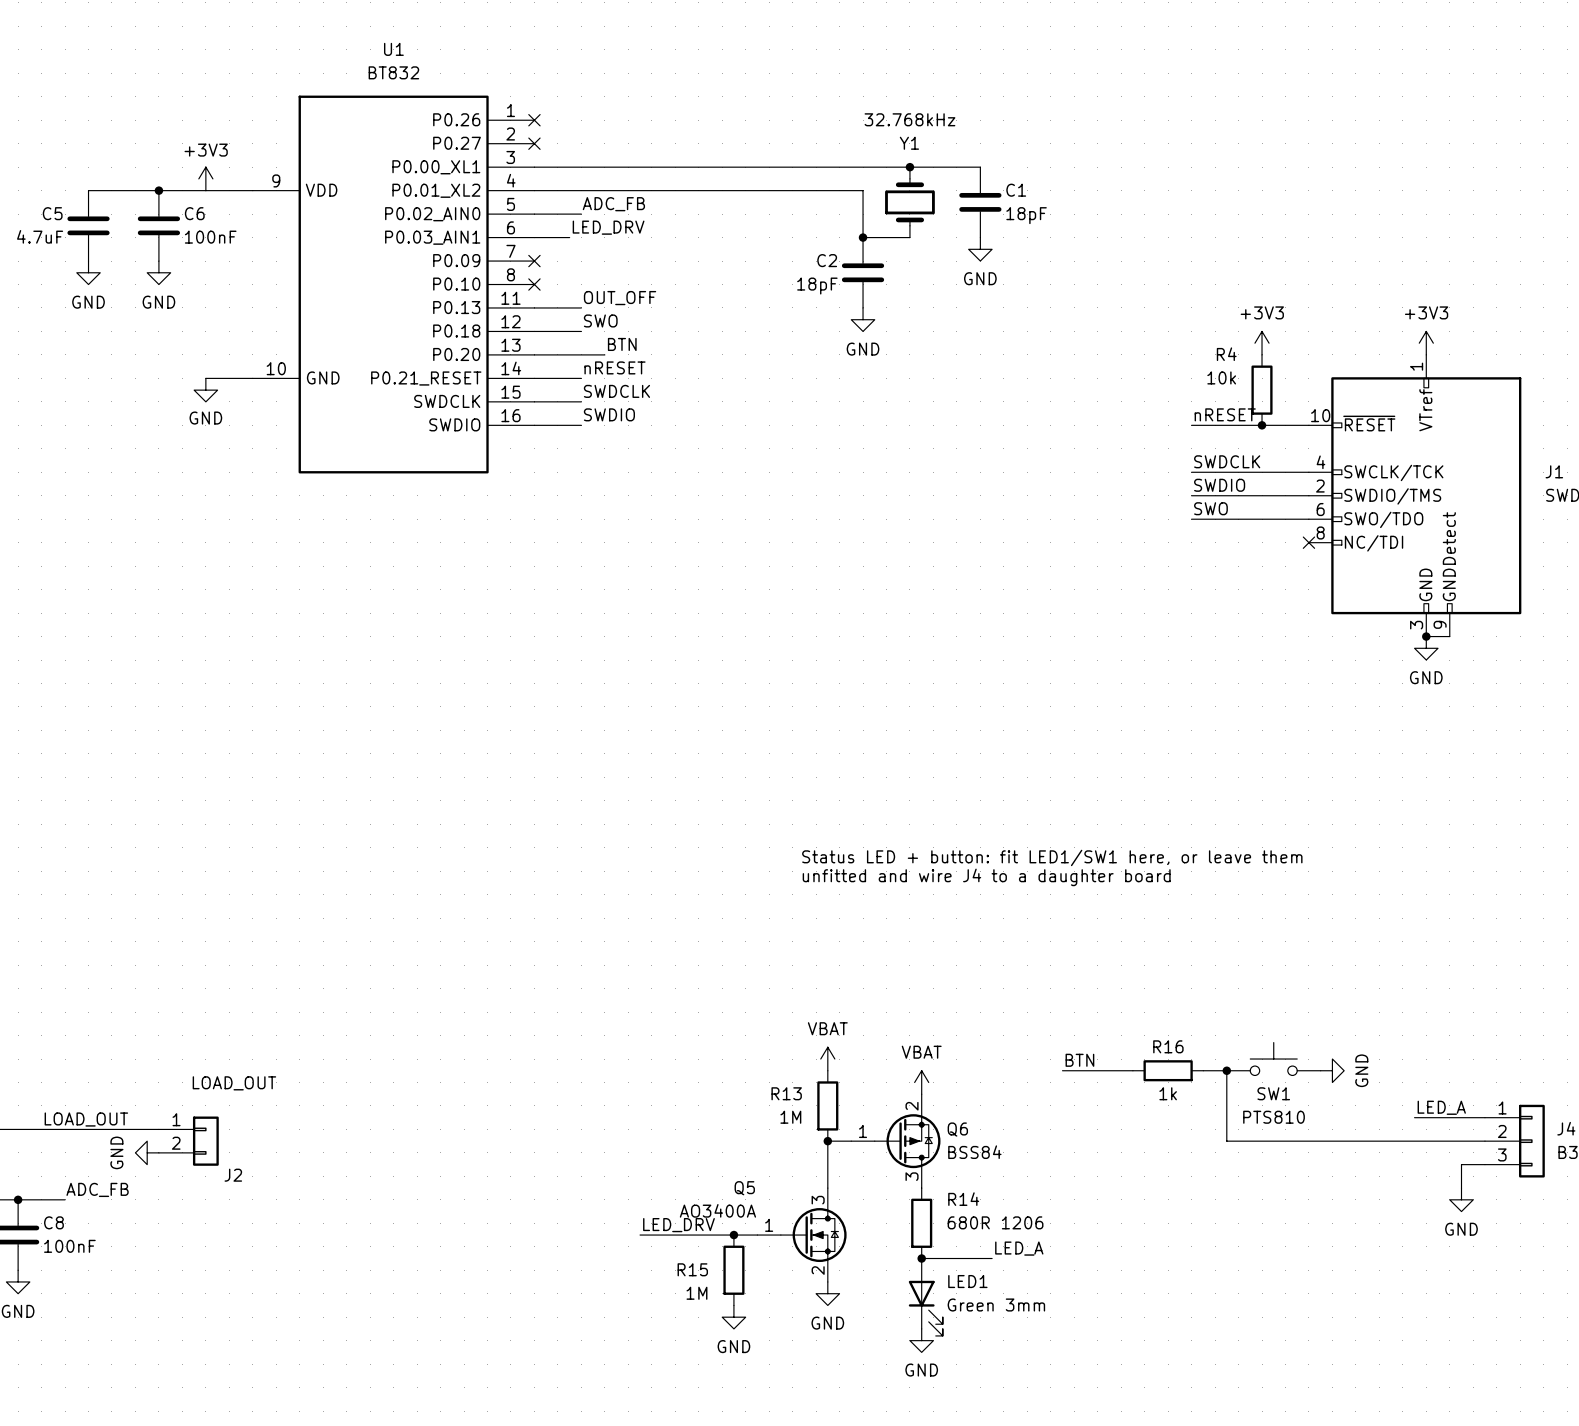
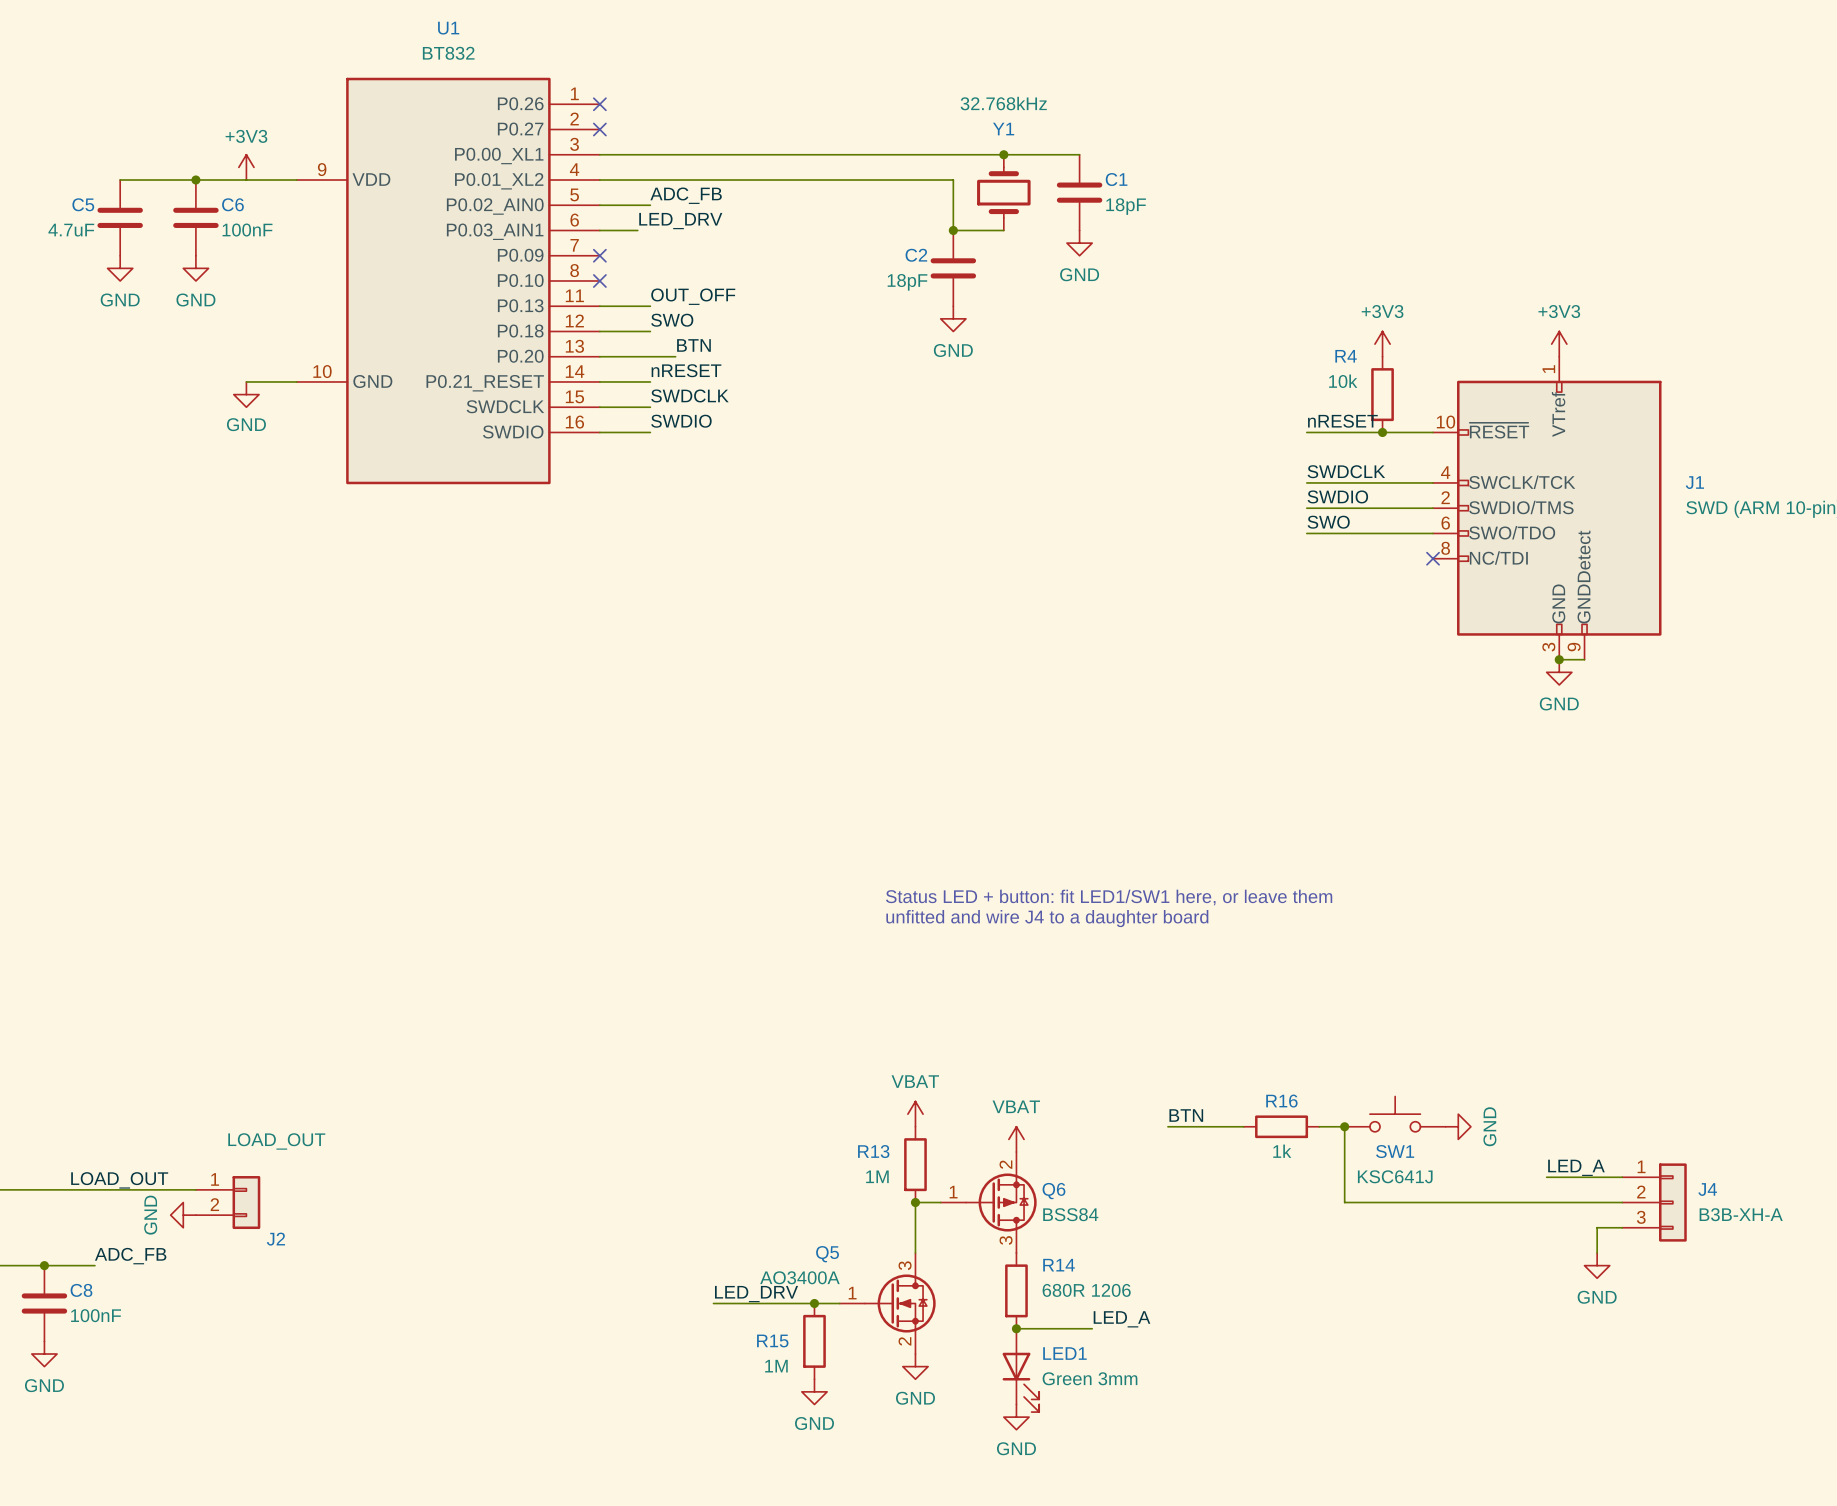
SW1 value: PTS810 (1274, 1117) -> KSC641J (1395, 1176)

